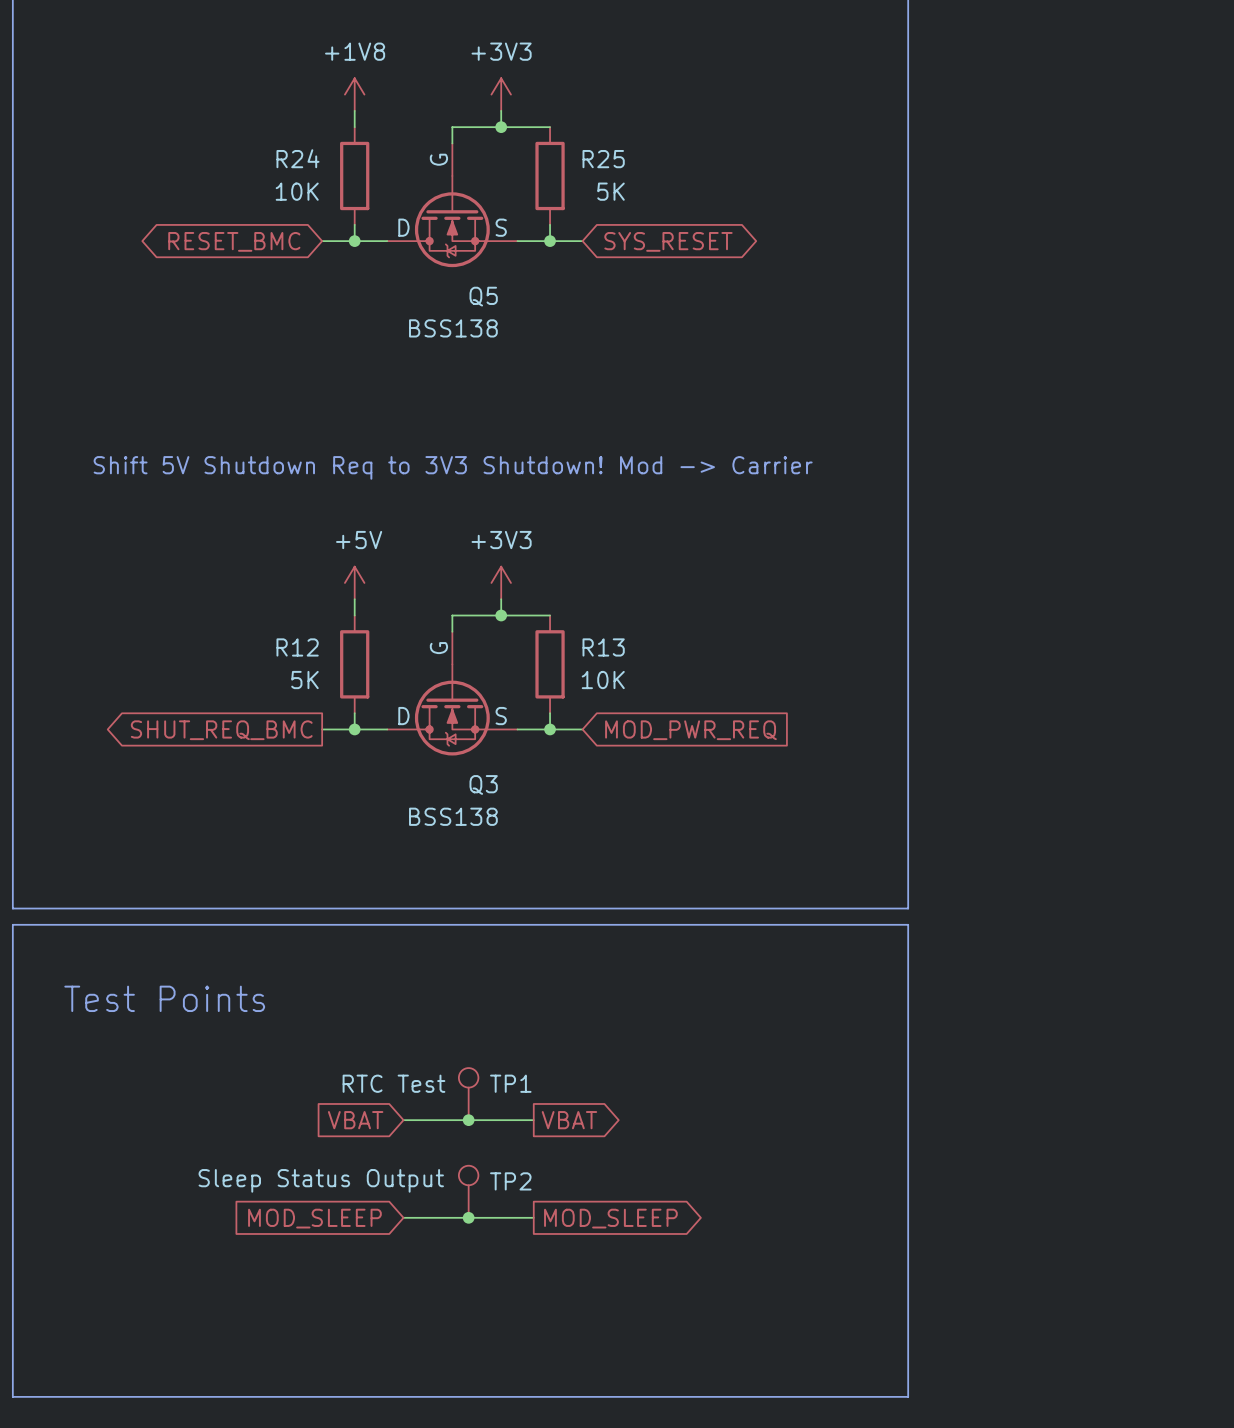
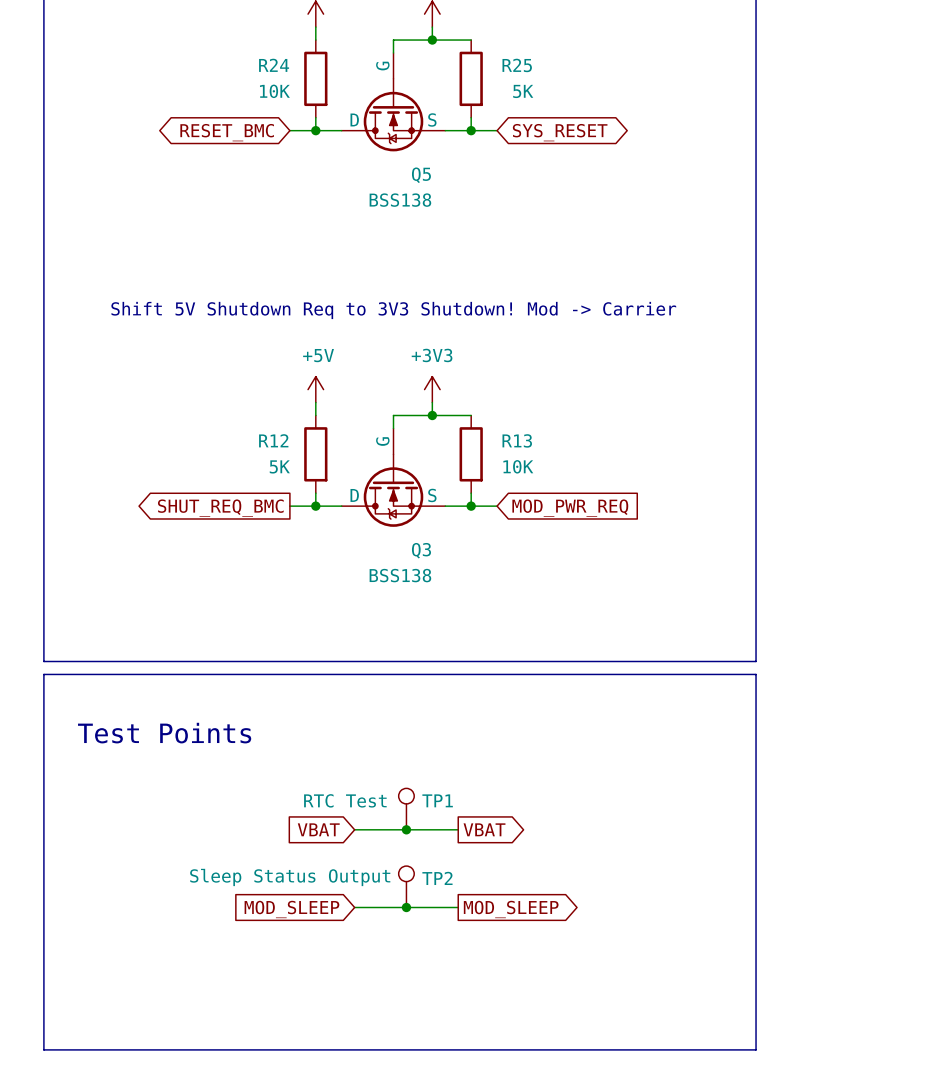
power symbol position: +5V (354, 582) -> +5V (315, 389)
power symbol position: +3V3 (501, 582) -> +3V3 (432, 389)
junction position: (501, 615) -> (432, 415)
wire: (550, 615) (452, 615) (452, 631) -> (471, 415) (393, 415) (393, 428)
R12 position: (354, 664) -> (315, 454)
R13 position: (550, 664) -> (471, 454)
Q3 position: (452, 693) -> (393, 477)
wire: (322, 729) (387, 729) -> (289, 506) (341, 506)
junction position: (354, 729) -> (315, 506)
wire: (517, 729) (582, 729) -> (445, 506) (497, 506)
junction position: (550, 729) -> (471, 506)
global label position: SHUT_REQ_BMC (221, 730) -> SHUT_REQ_BMC (220, 508)
global label position: MOD_PWR_REQ (690, 730) -> MOD_PWR_REQ (570, 508)

